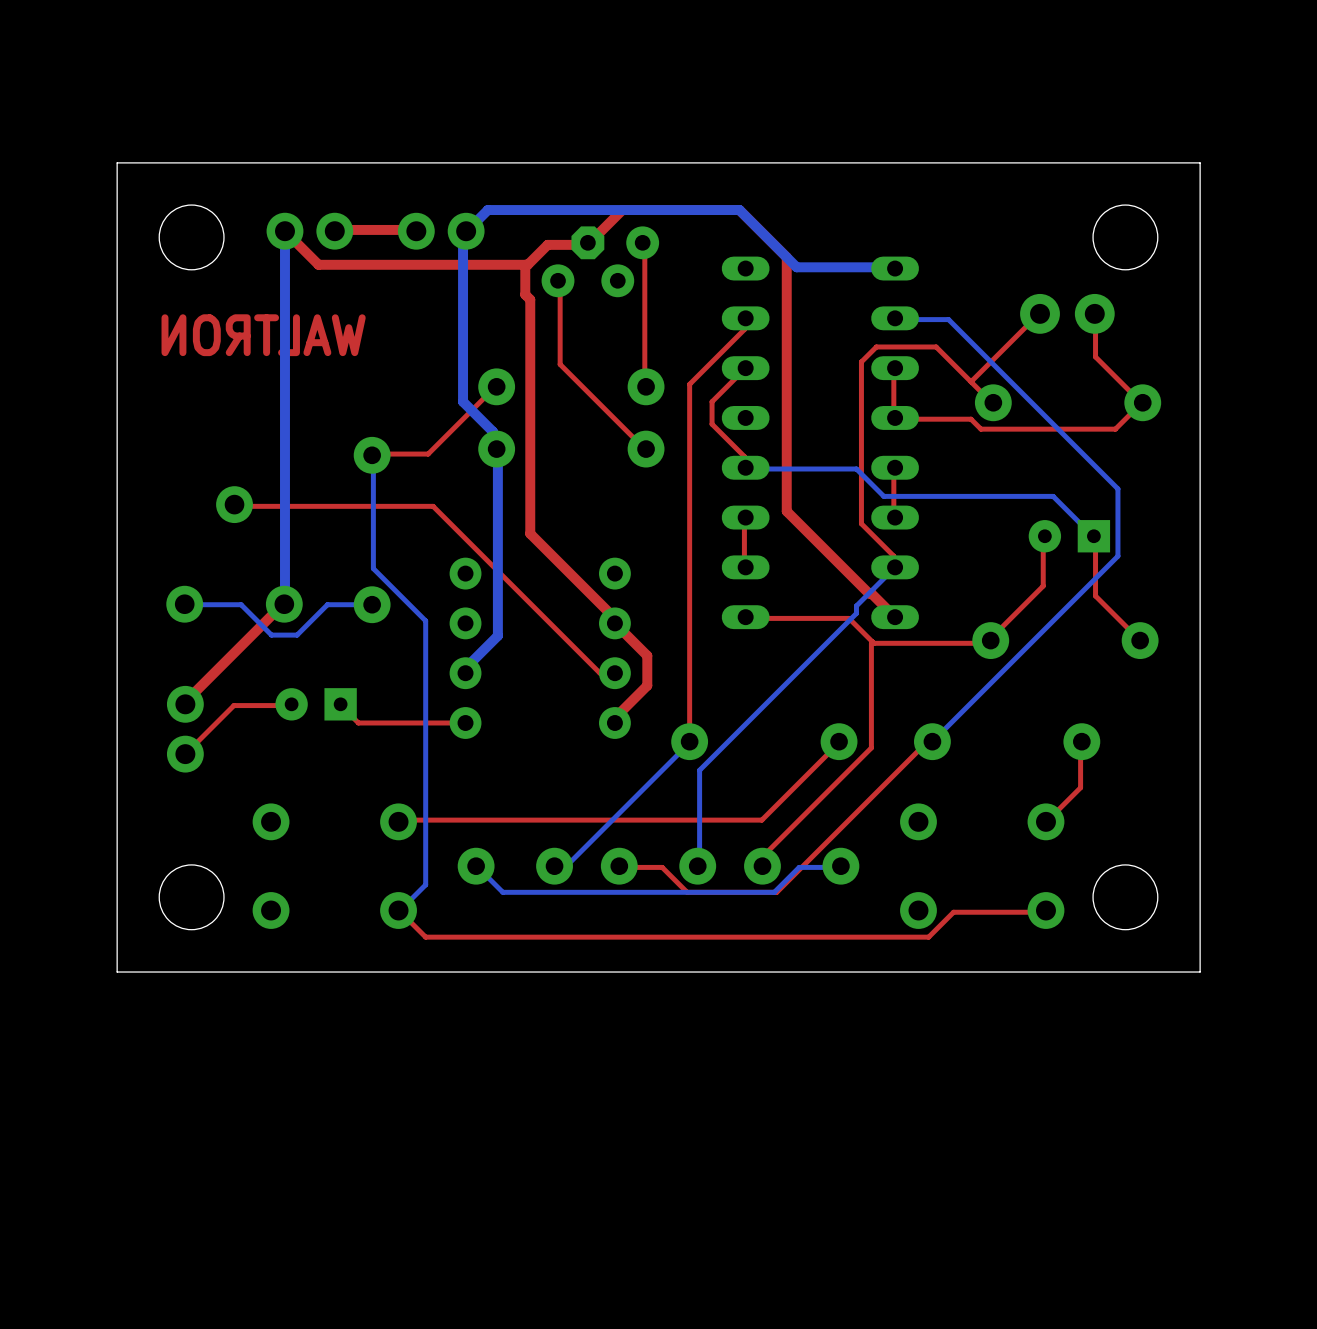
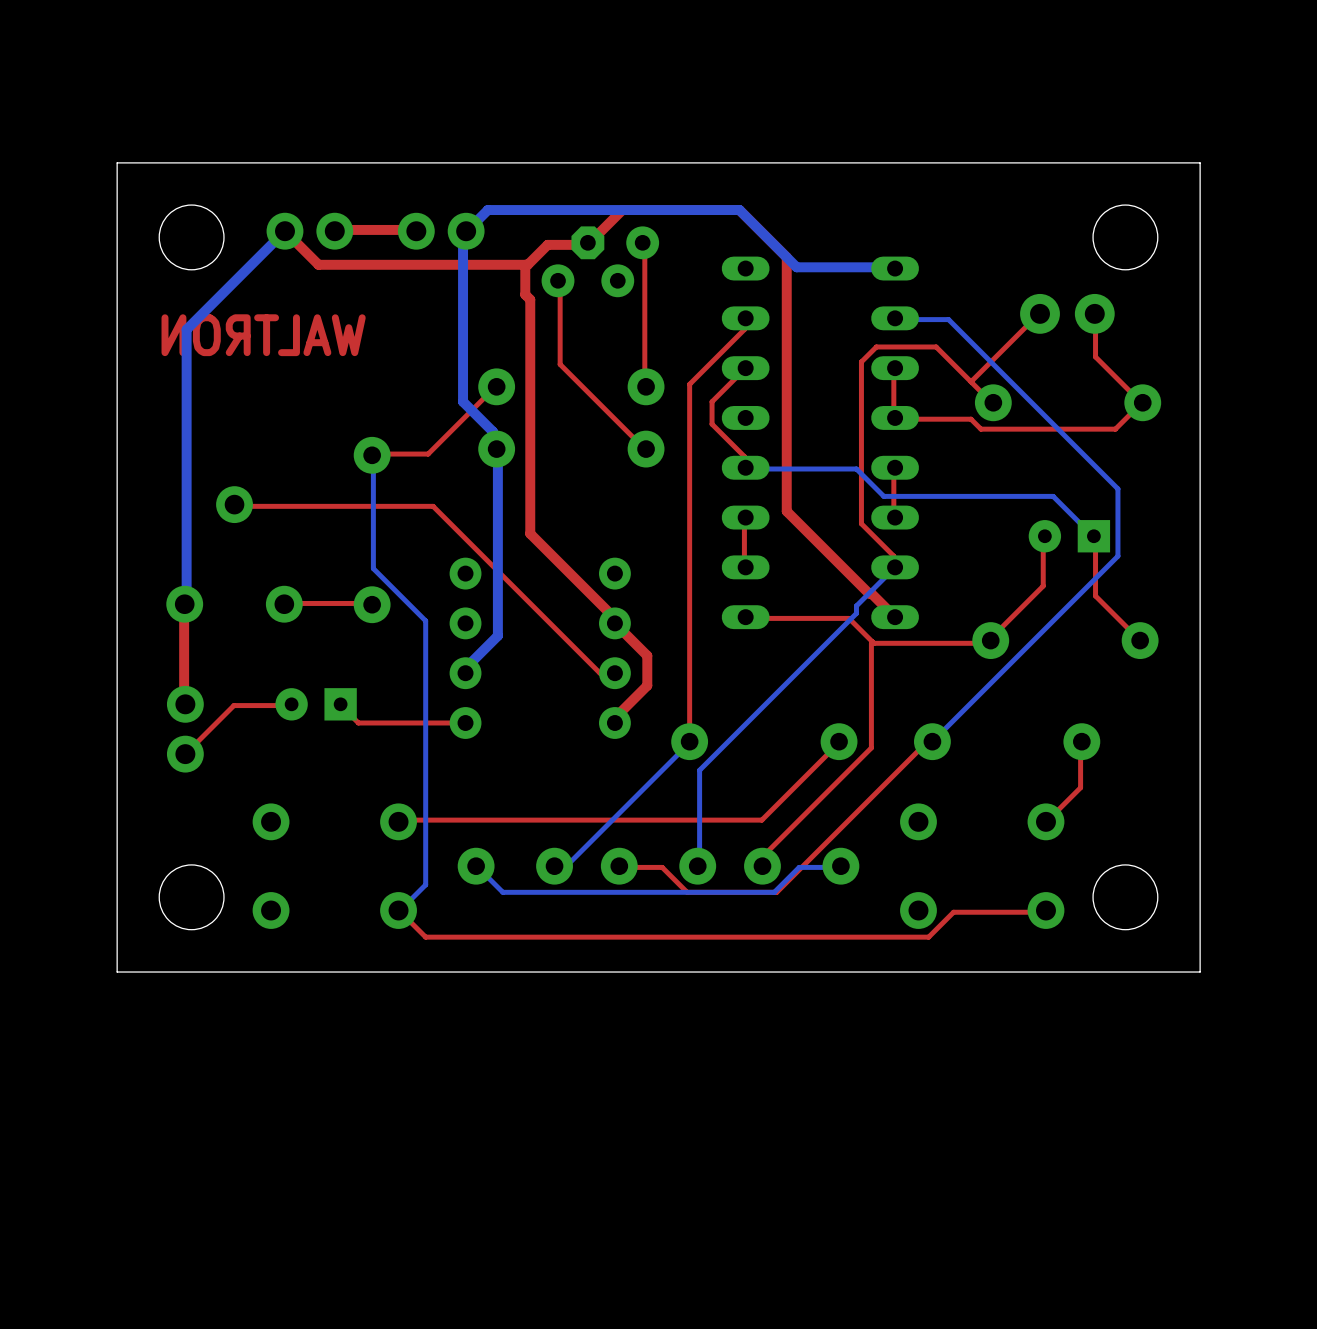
bottom track: (284, 231) (284, 604) -> (284, 231) (186, 329) (186, 603) (184, 604)
bottom track: (184, 604) (241, 604) (271, 635) (297, 635) (327, 604) (372, 604) -> none
top track: (284, 604) (184, 703) -> (184, 604) (184, 703)
top track: none -> (284, 604) (372, 604)

